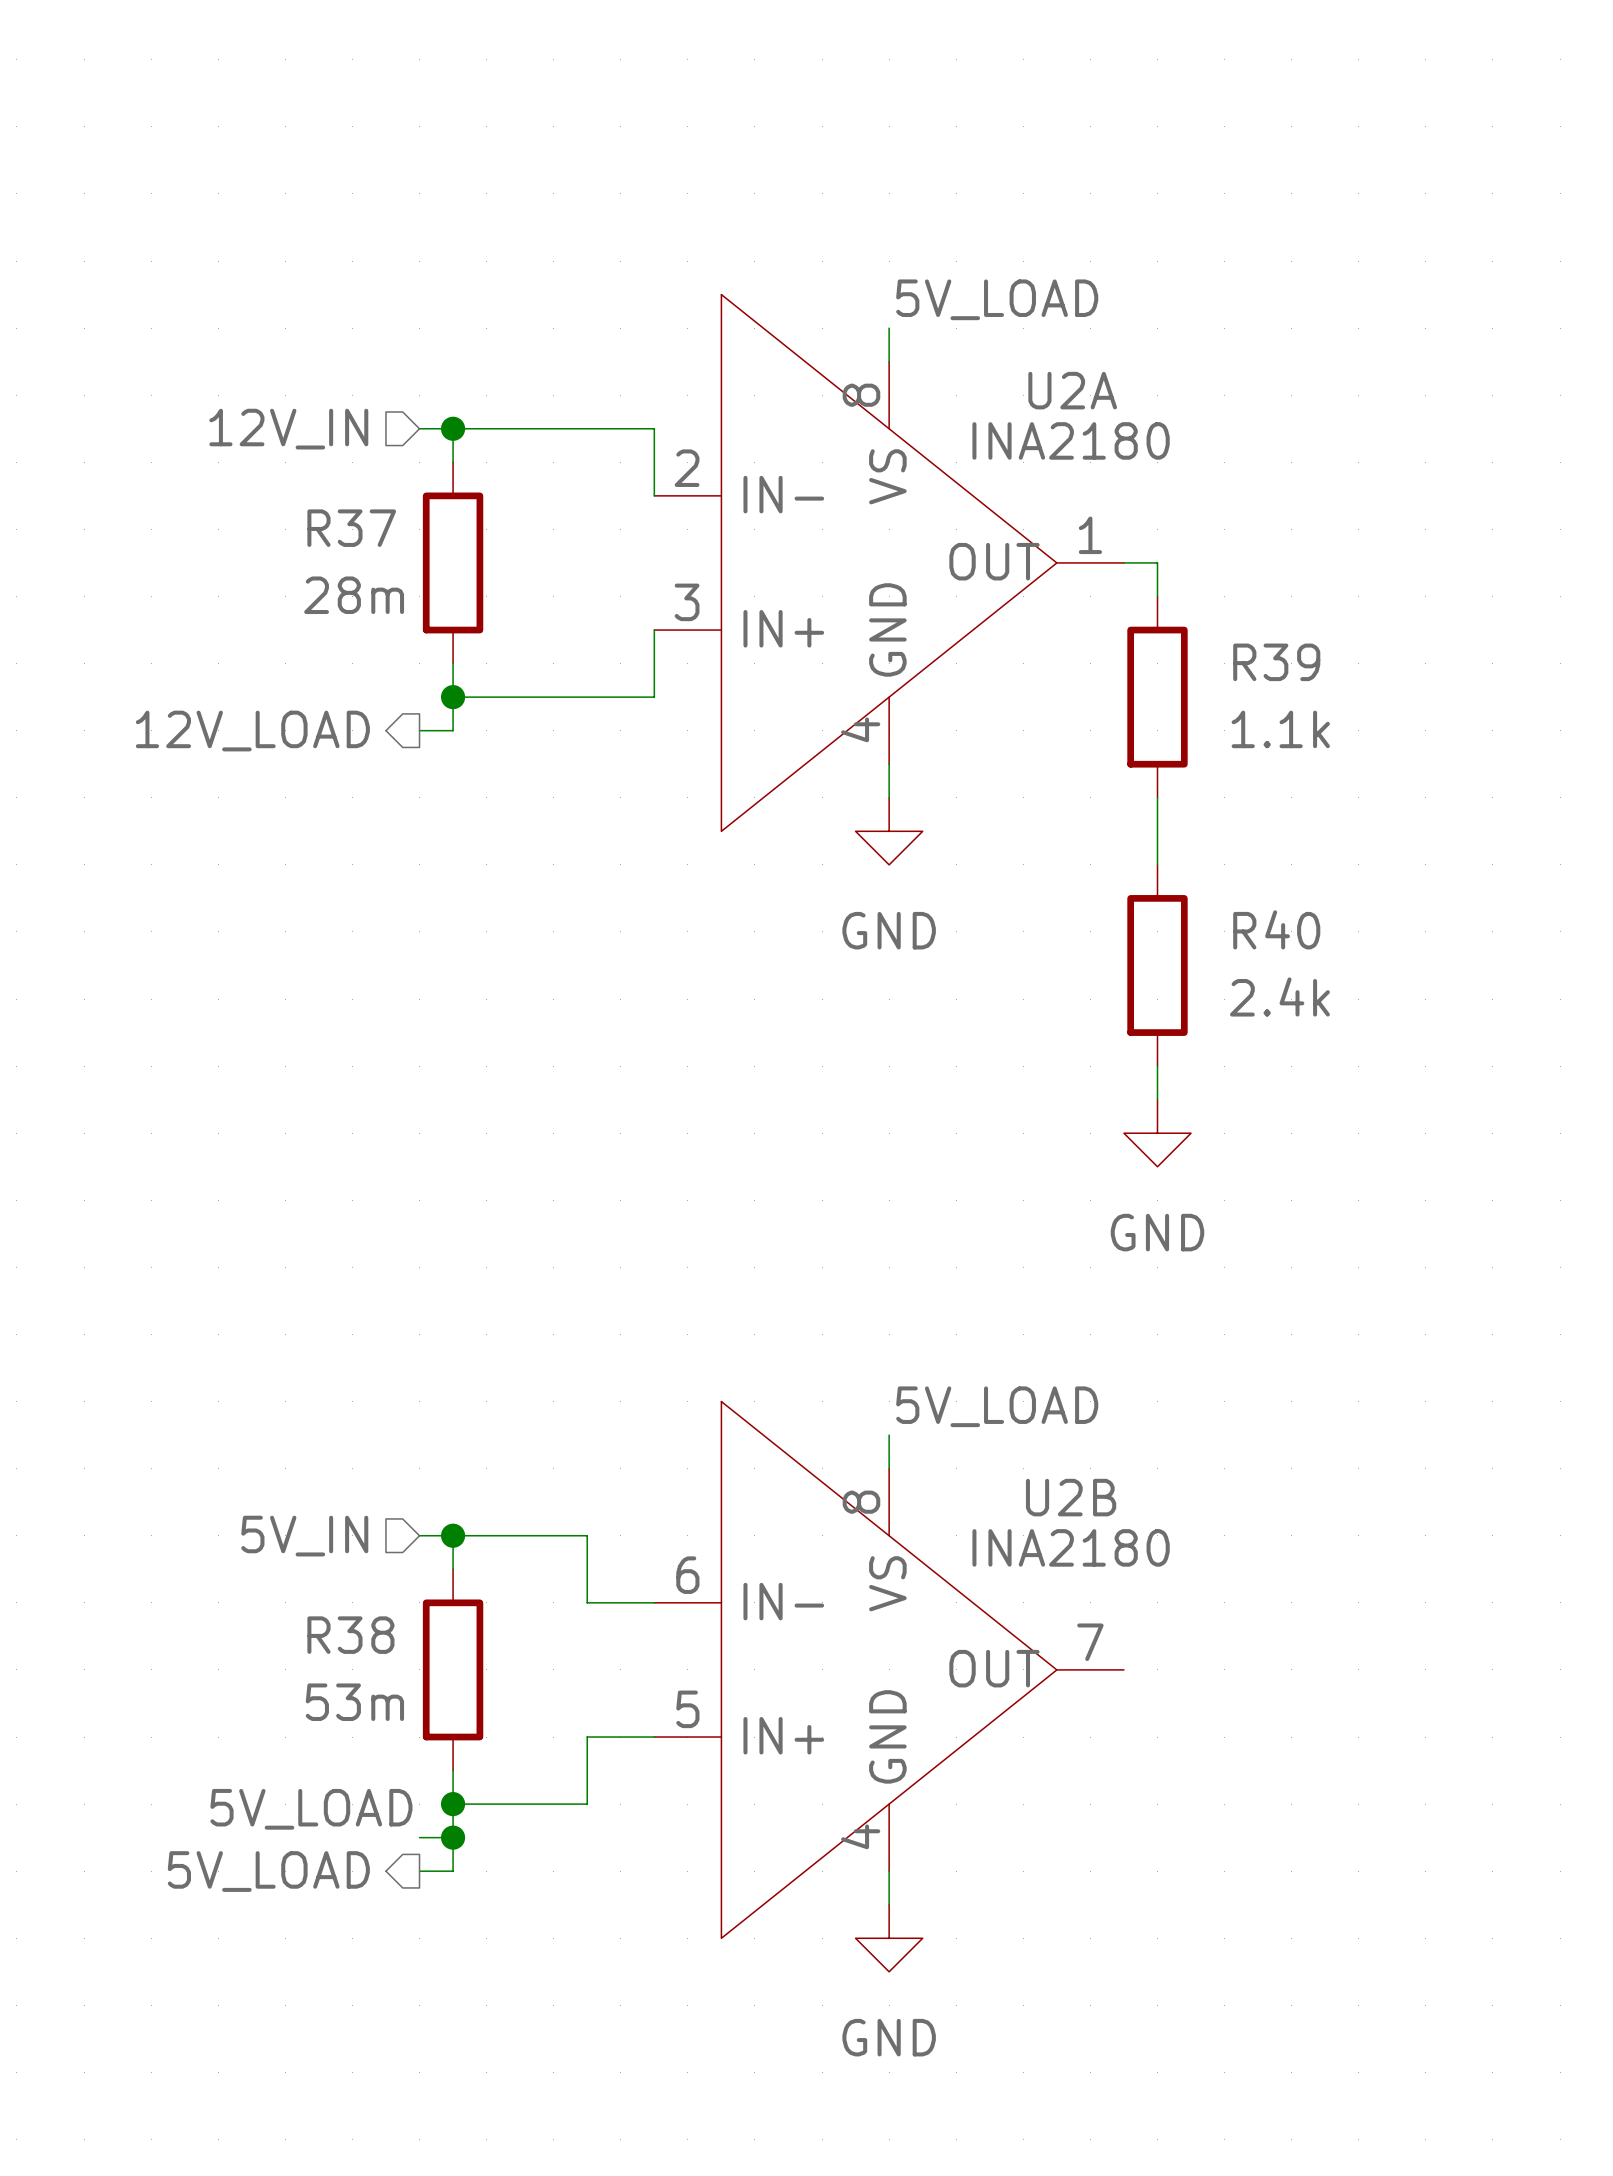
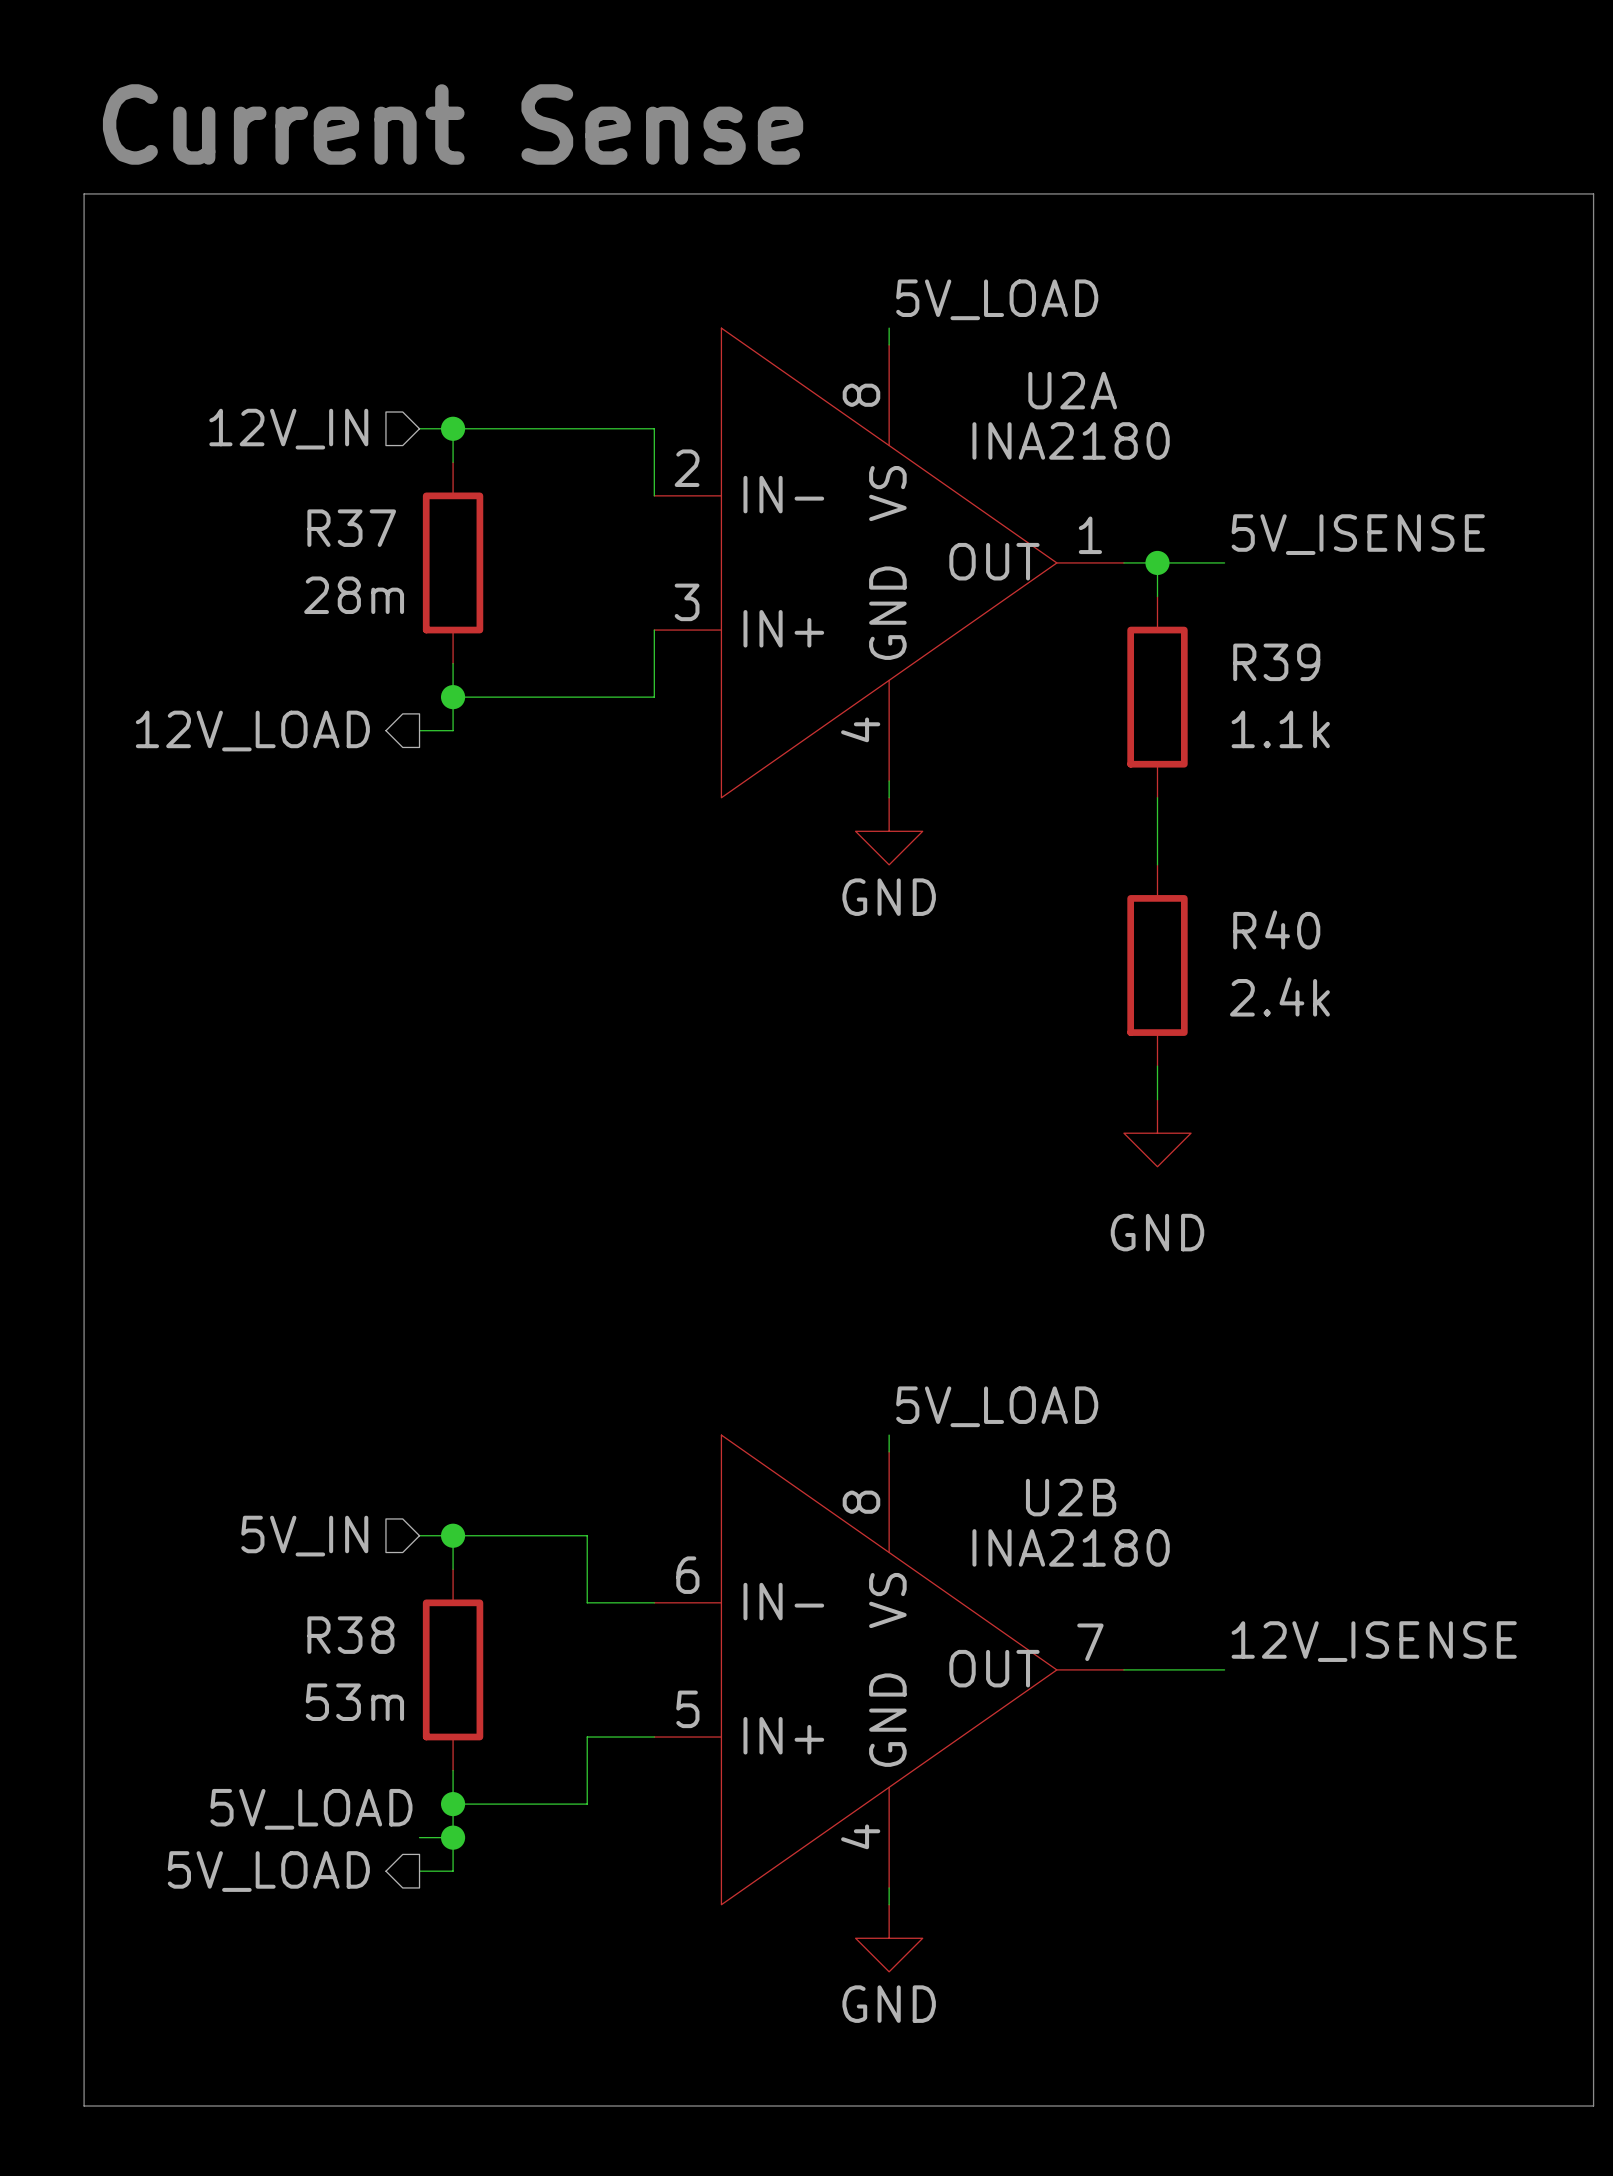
text: none -> Current Sense (453, 124)
line: none -> (84, 193) (1593, 193) (1593, 2106) (84, 2106) (84, 193)
U2A symbol: [654, 294, 1124, 832] -> [654, 328, 1124, 798]
label: none -> 5V_ISENSE (1358, 534)
wire: none -> (1157, 562) (1224, 562)
junction: none -> (1157, 562)
power symbol text position: GND (889, 930) -> GND (889, 897)
U2B symbol: [654, 1401, 1124, 1939] -> [654, 1435, 1124, 1905]
label: none -> 12V_ISENSE (1374, 1641)
wire: none -> (1123, 1669) (1224, 1669)
power symbol text position: GND (889, 2037) -> GND (889, 2004)

